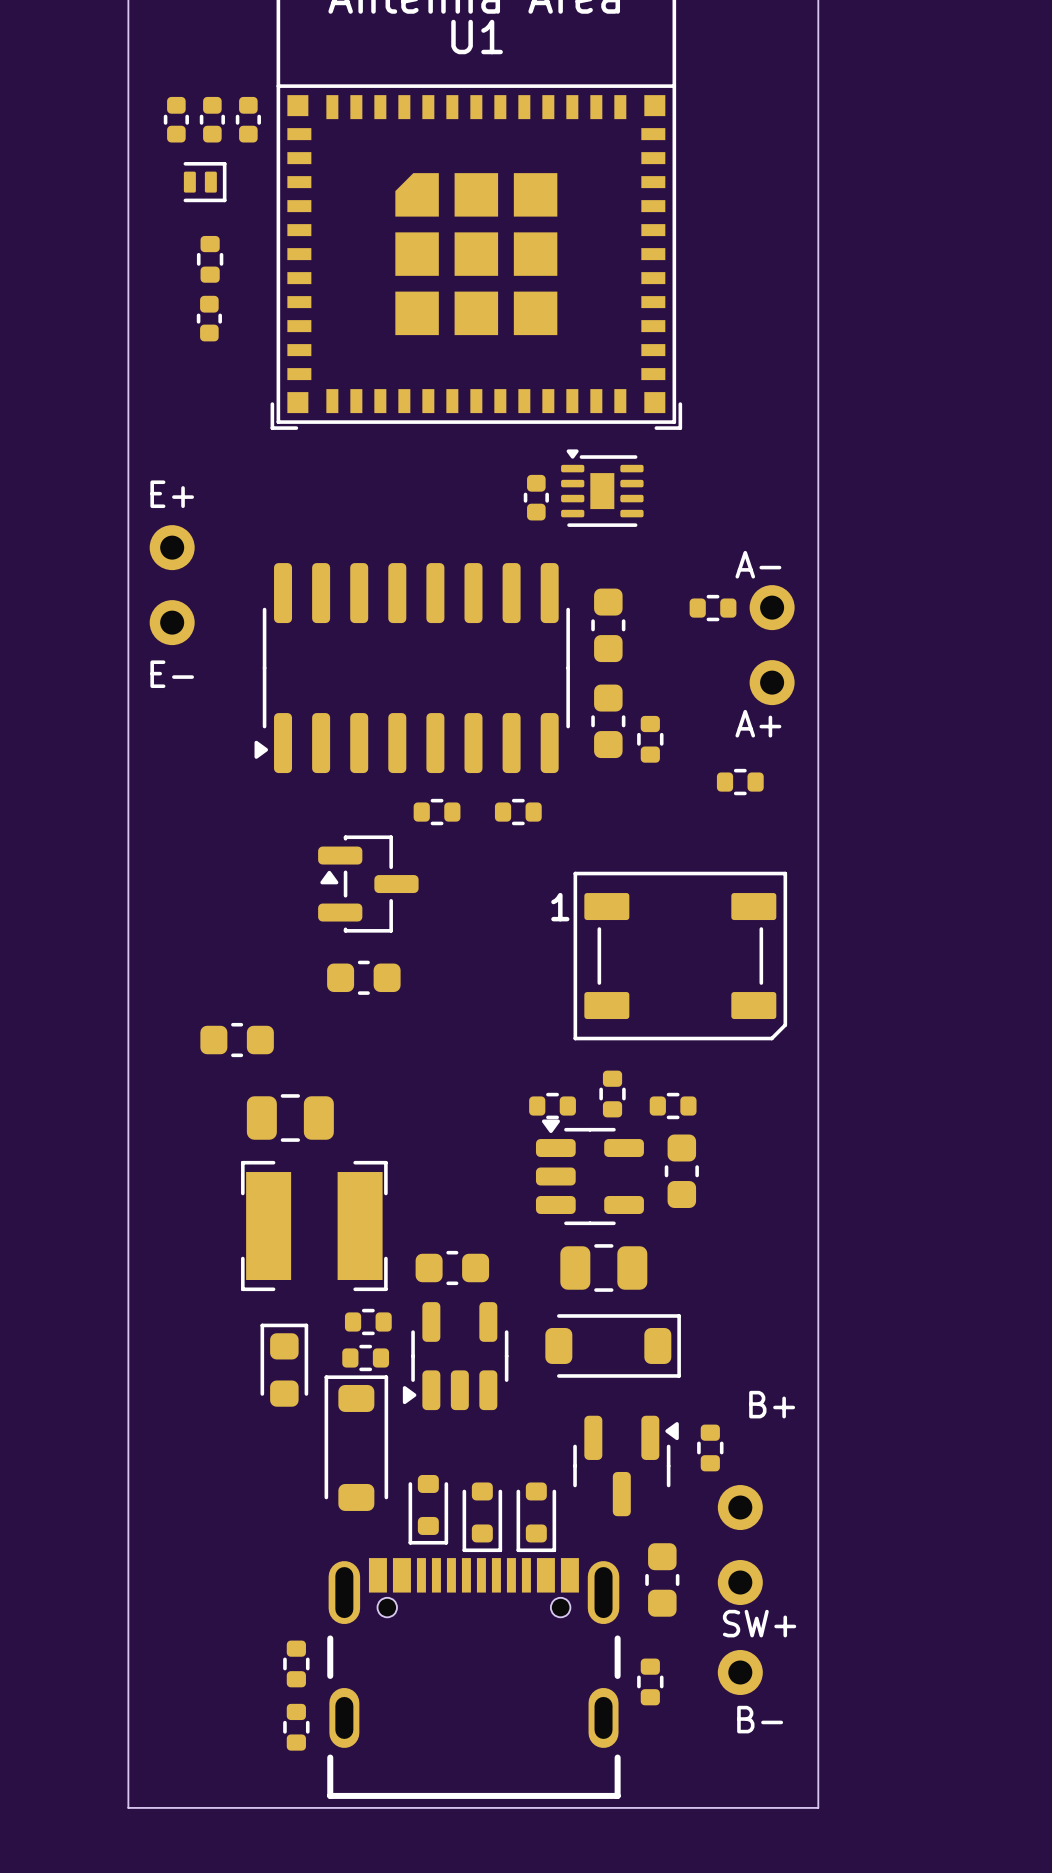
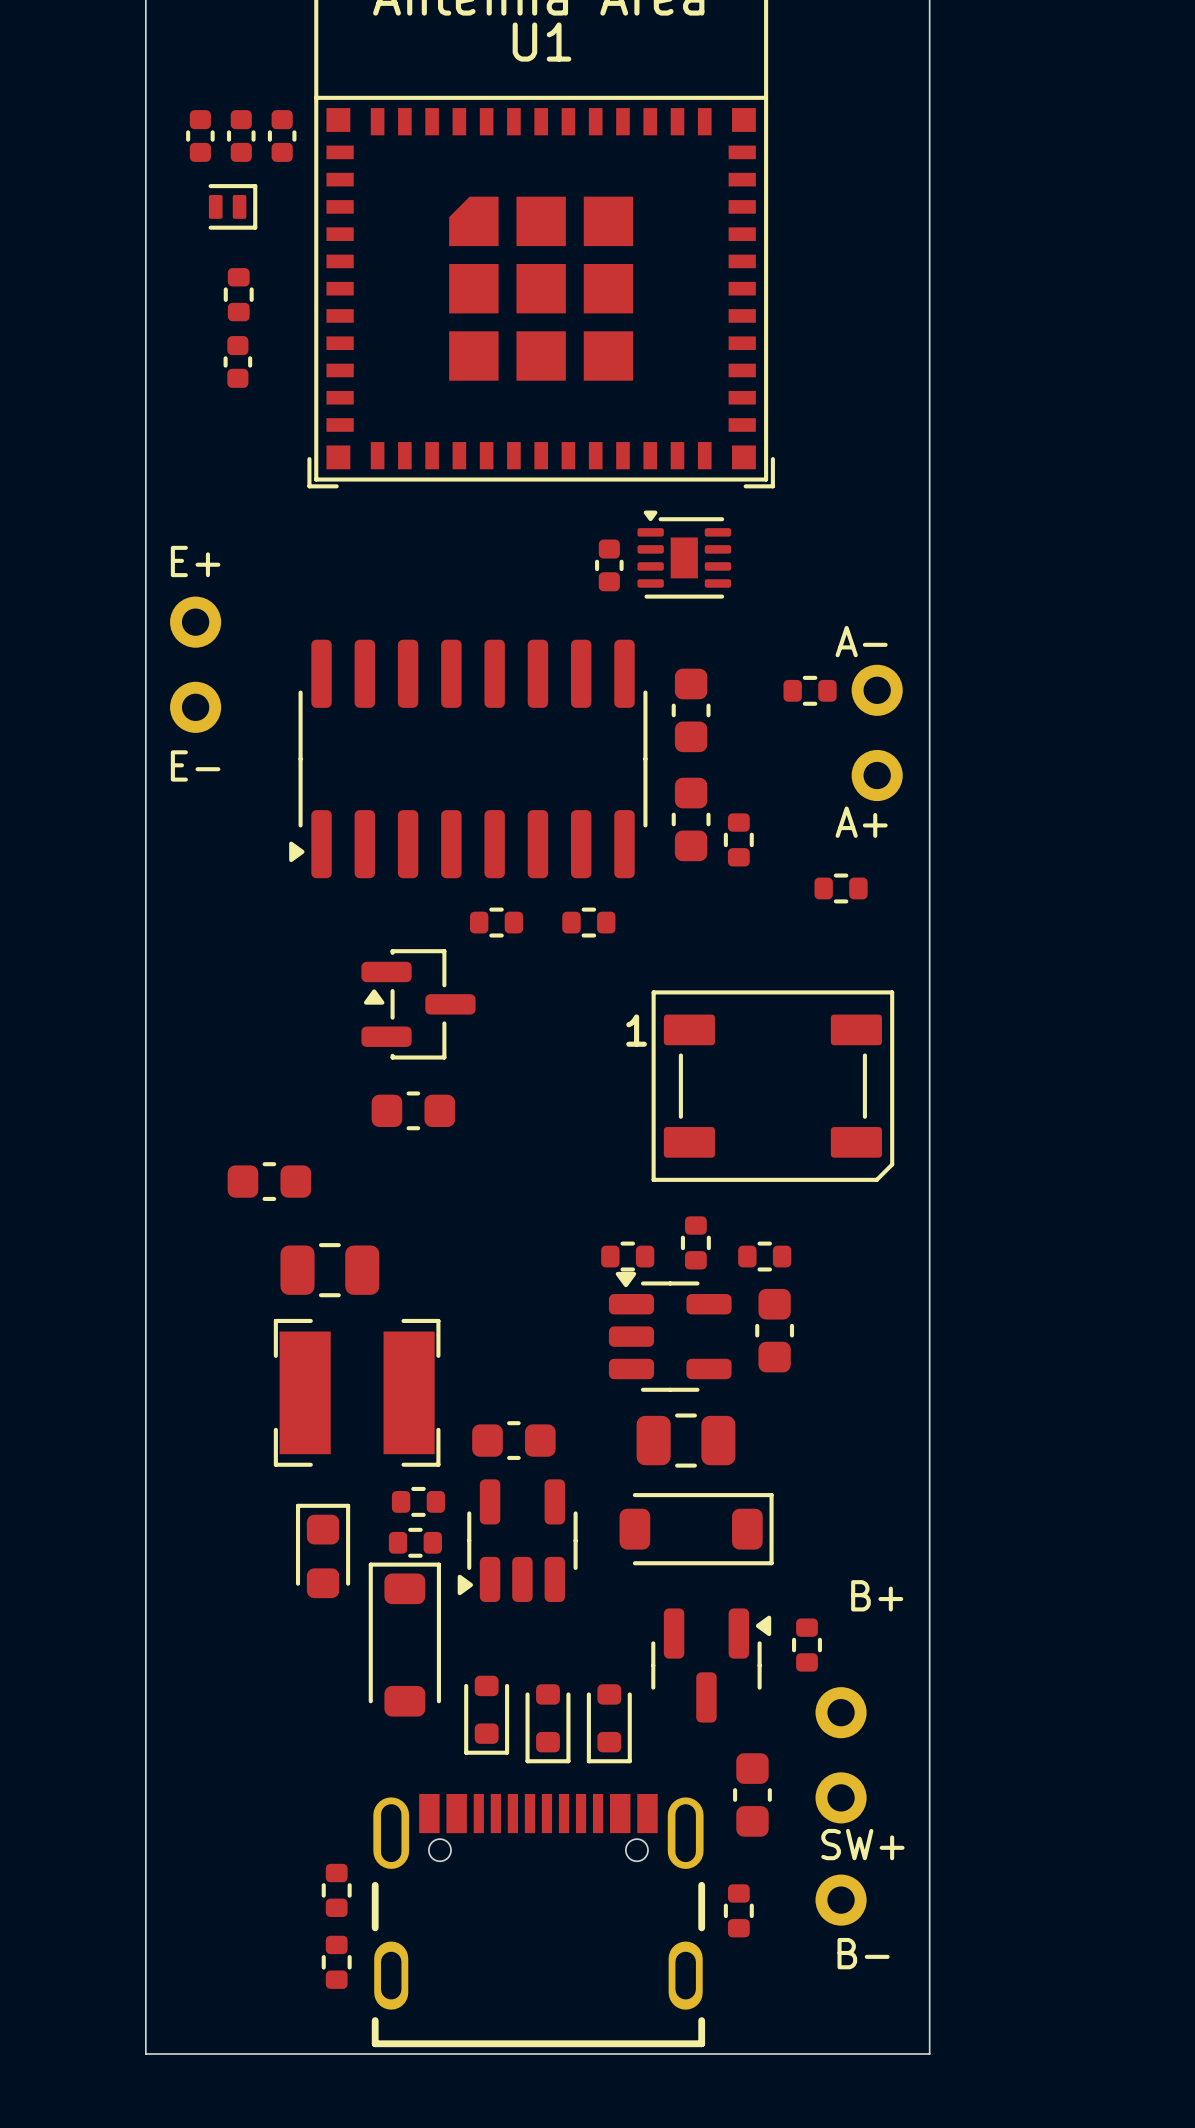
part footprint: [327, 1558, 621, 1799] -> [371, 1793, 706, 2048]

